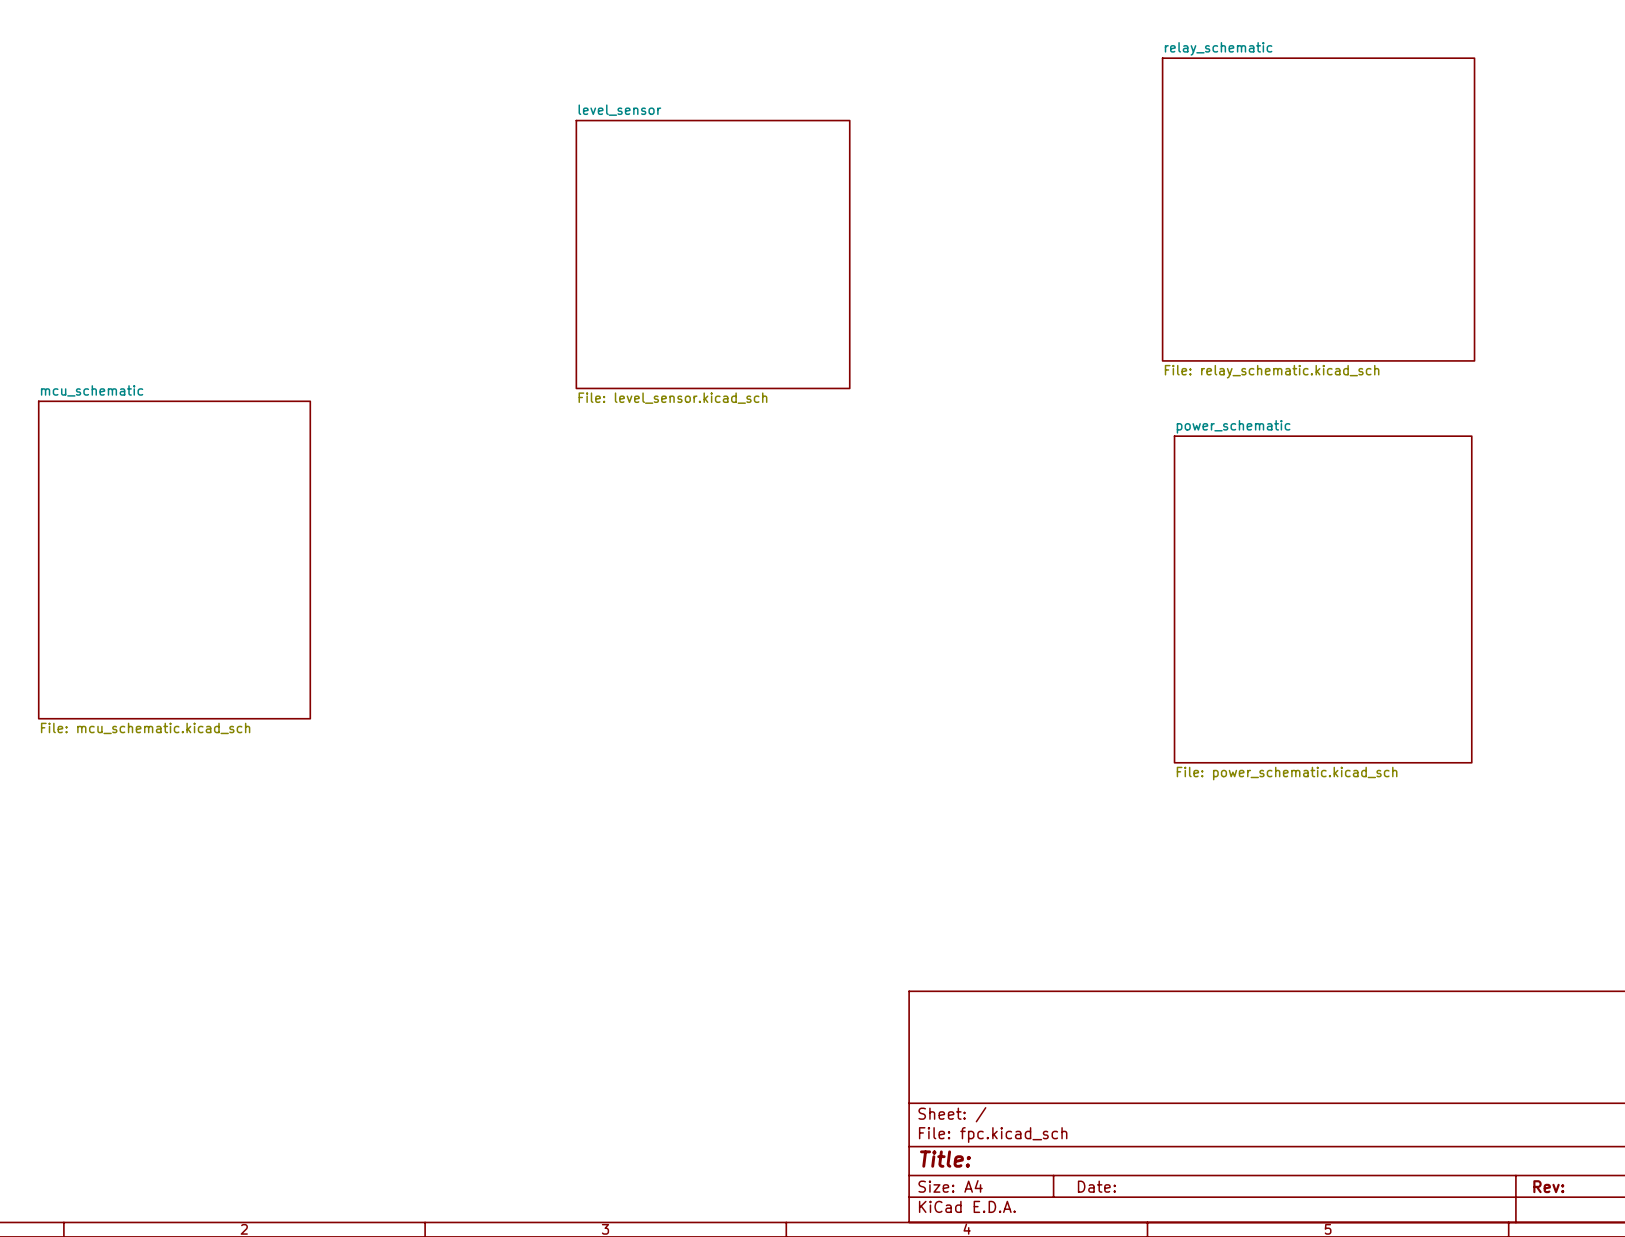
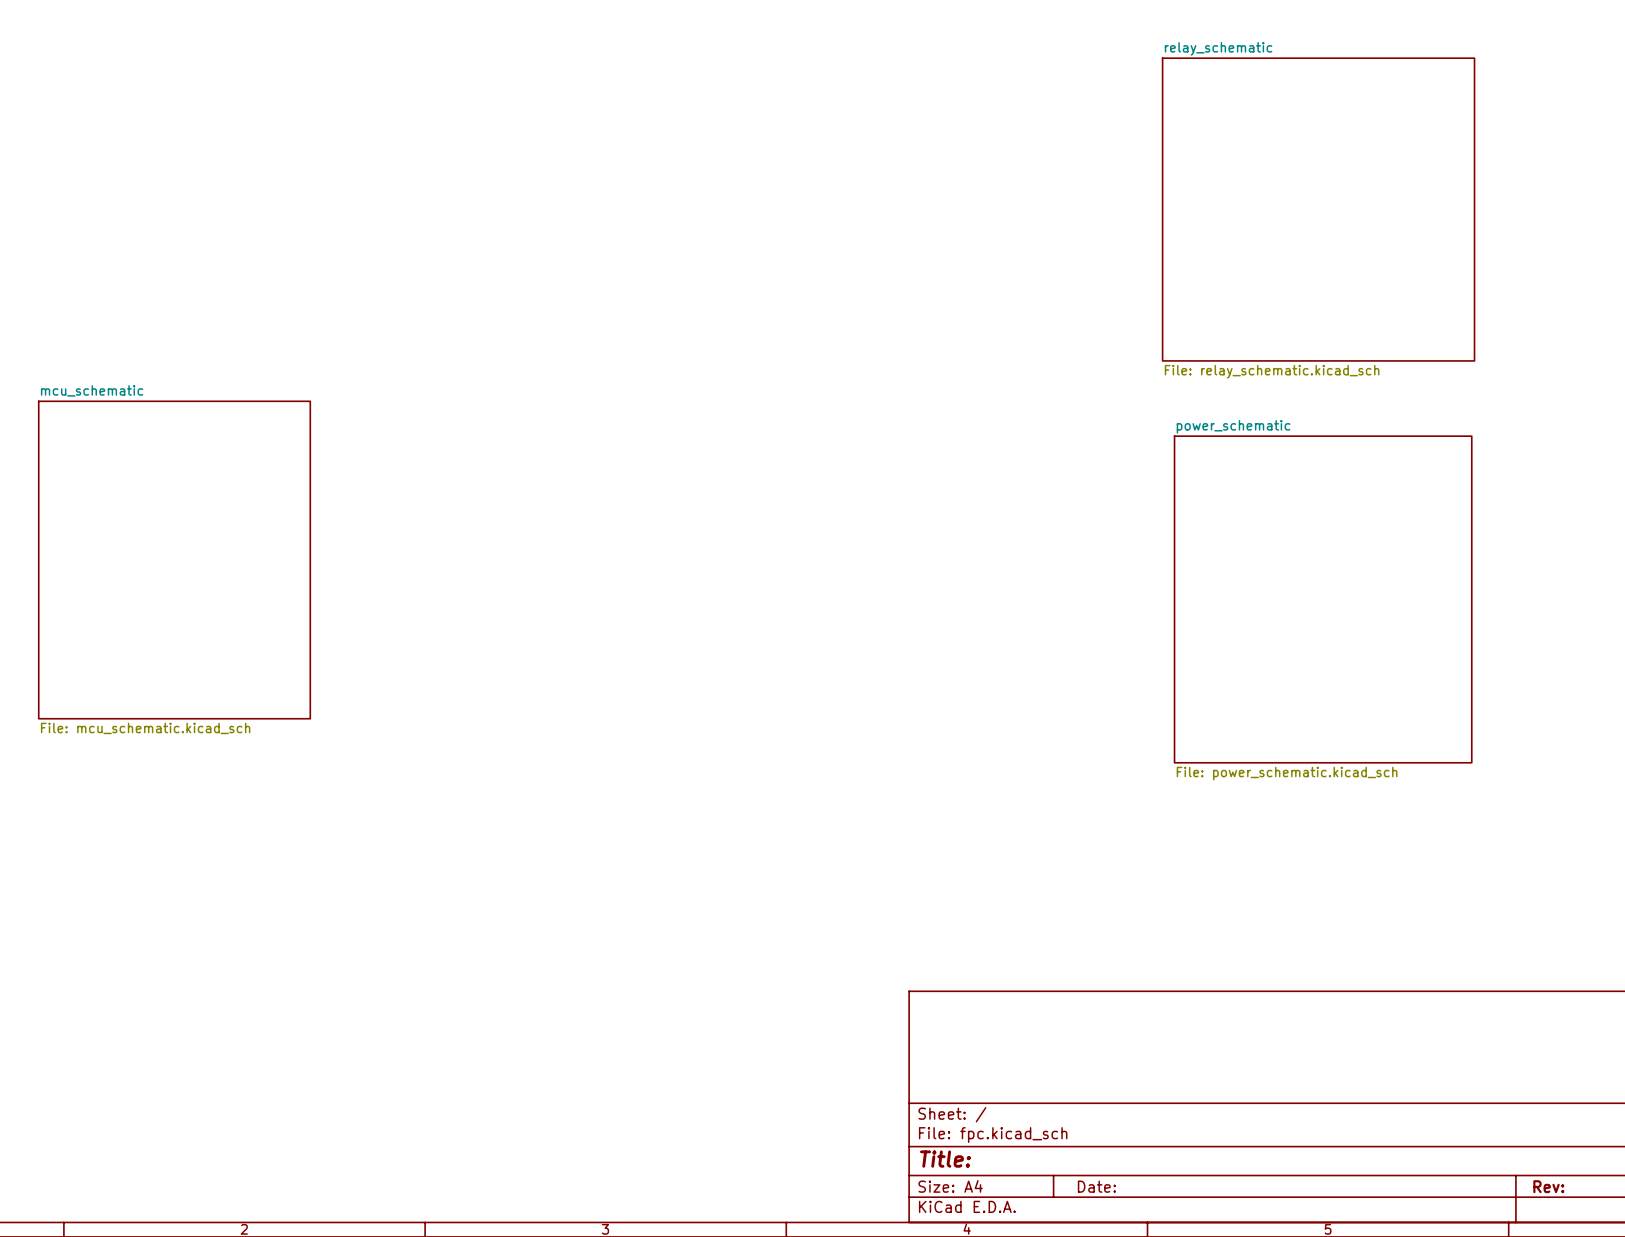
sheet level_sensor: File: level_sensor.kicad_sch (713, 254) -> none

